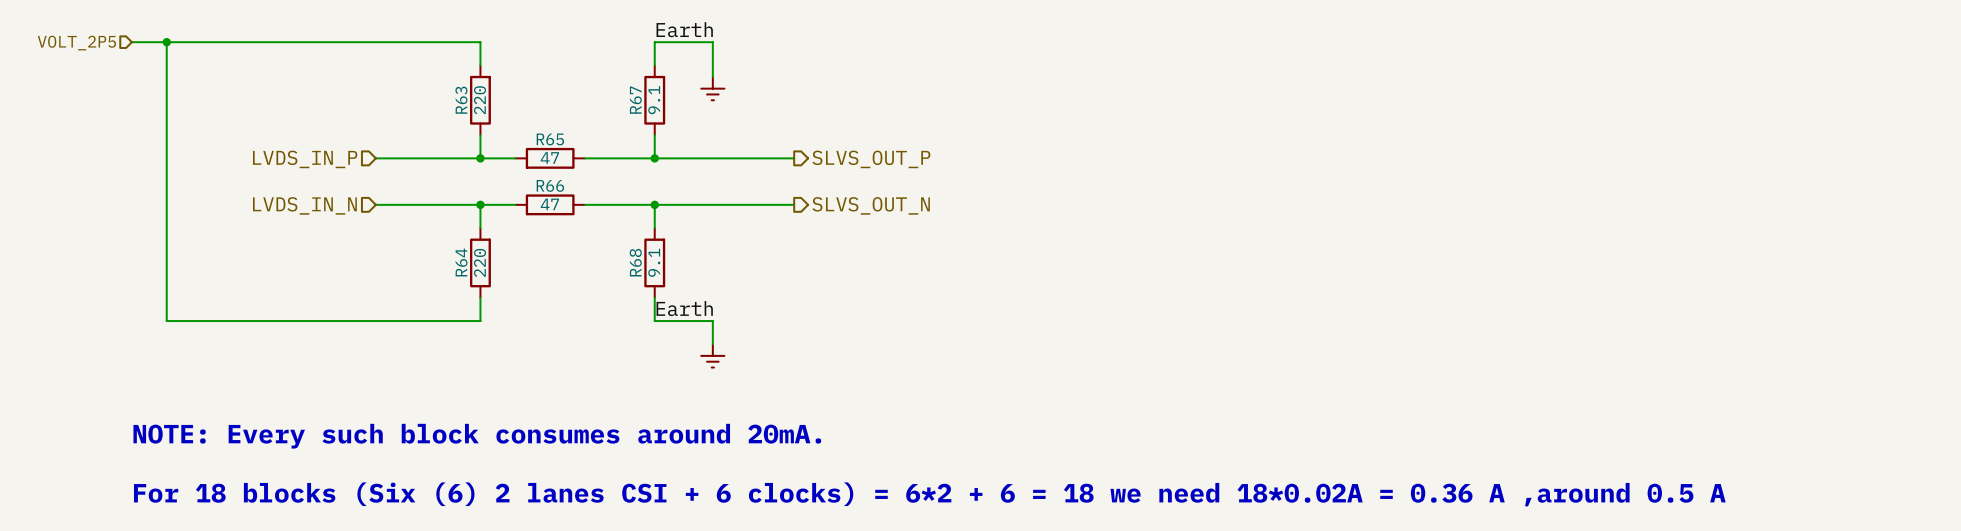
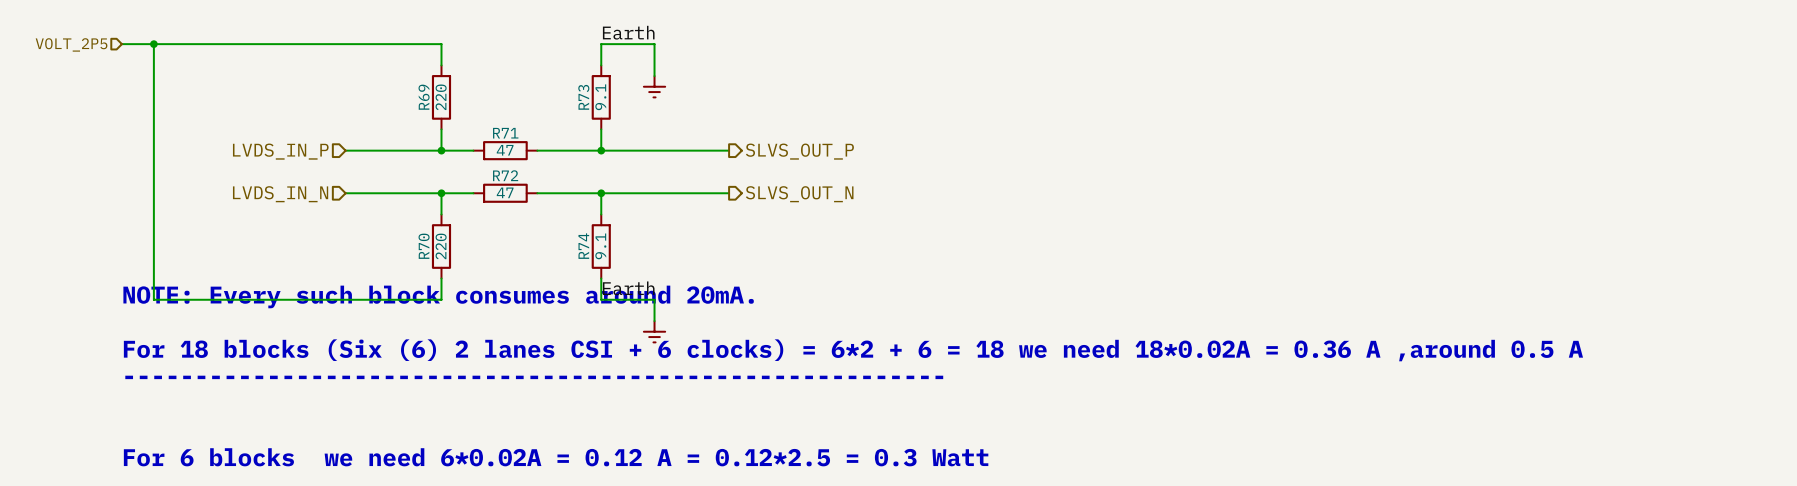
R63 name: R63 (461, 100) -> R69 (424, 97)
R67 name: R67 (635, 100) -> R73 (583, 97)
R65 name: R65 (550, 139) -> R71 (505, 133)
R66 name: R66 (550, 185) -> R72 (505, 175)
R64 name: R64 (461, 262) -> R70 (424, 246)
R68 name: R68 (635, 262) -> R74 (583, 246)
text: none -> For 18 blocks (Six (6) 2 lanes CSI + 6 clocks) = 6*2 + 6 = 18 we need 18*0.02A = 0.36 A ,around 0.5 A (853, 350)
text: none -> --------------------------------------------------------- (534, 377)
text position: NOTE: Every such block consumes around 20mA. (477, 436) -> NOTE: Every such block consumes around 20mA. (438, 296)
text: For 18 blocks (Six (6) 2 lanes CSI + 6 clocks) = 6*2 + 6 = 18 we need 18*0.02A = 0.36 A ,around 0.5 A (929, 494) -> For 6 blocks we need 6*0.02A = 0.12 A = 0.12*2.5 = 0.3 Watt (556, 457)

